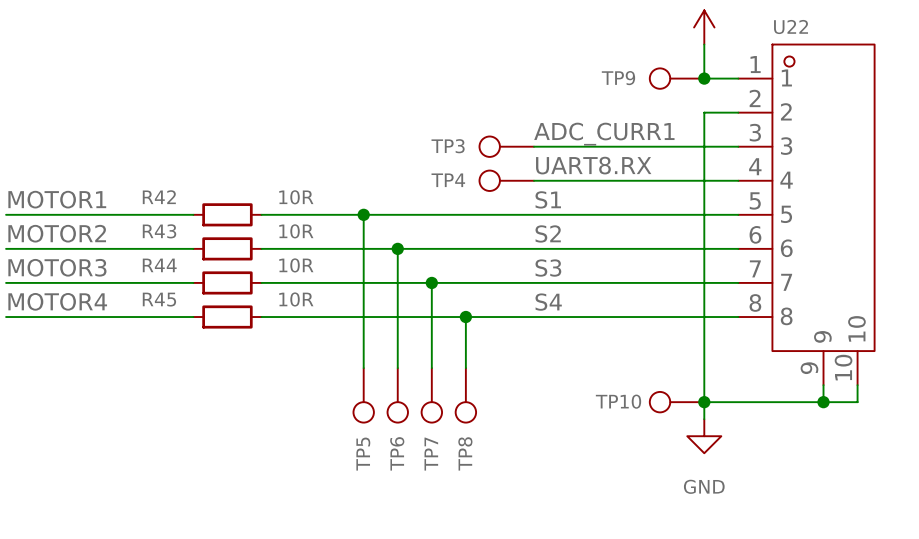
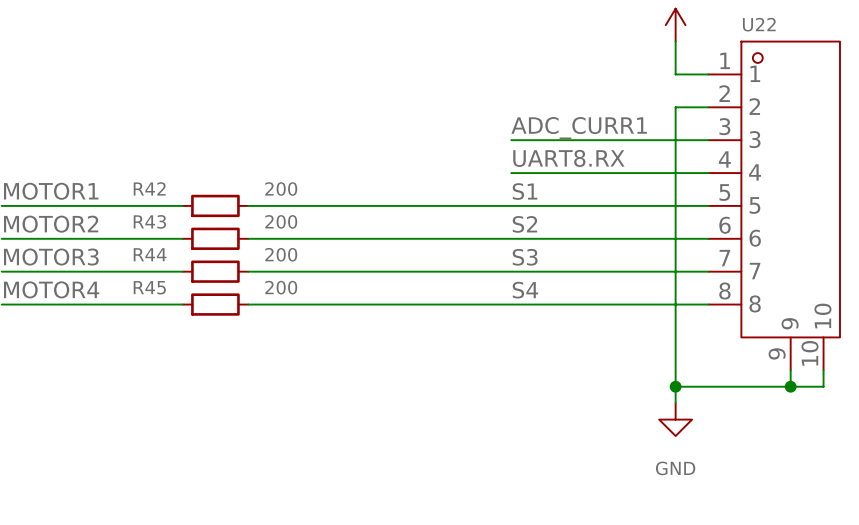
TP9: (677, 78) -> none
junction: (704, 78) -> none
TP3: (506, 146) -> none
TP4: (506, 180) -> none
R42 value: 10R (296, 197) -> 200 (281, 189)
wire: (363, 214) (363, 368) -> none
junction: (363, 214) -> none
R43 value: 10R (296, 231) -> 200 (281, 221)
wire: (397, 248) (397, 368) -> none
junction: (397, 248) -> none
R44 value: 10R (296, 265) -> 200 (281, 254)
wire: (431, 282) (431, 368) -> none
junction: (431, 282) -> none
R45 value: 10R (296, 299) -> 200 (281, 287)
wire: (465, 317) (465, 368) -> none
junction: (465, 317) -> none
TP5: (363, 395) -> none
TP6: (397, 395) -> none
TP7: (431, 395) -> none
TP8: (465, 395) -> none
TP10: (677, 402) -> none

